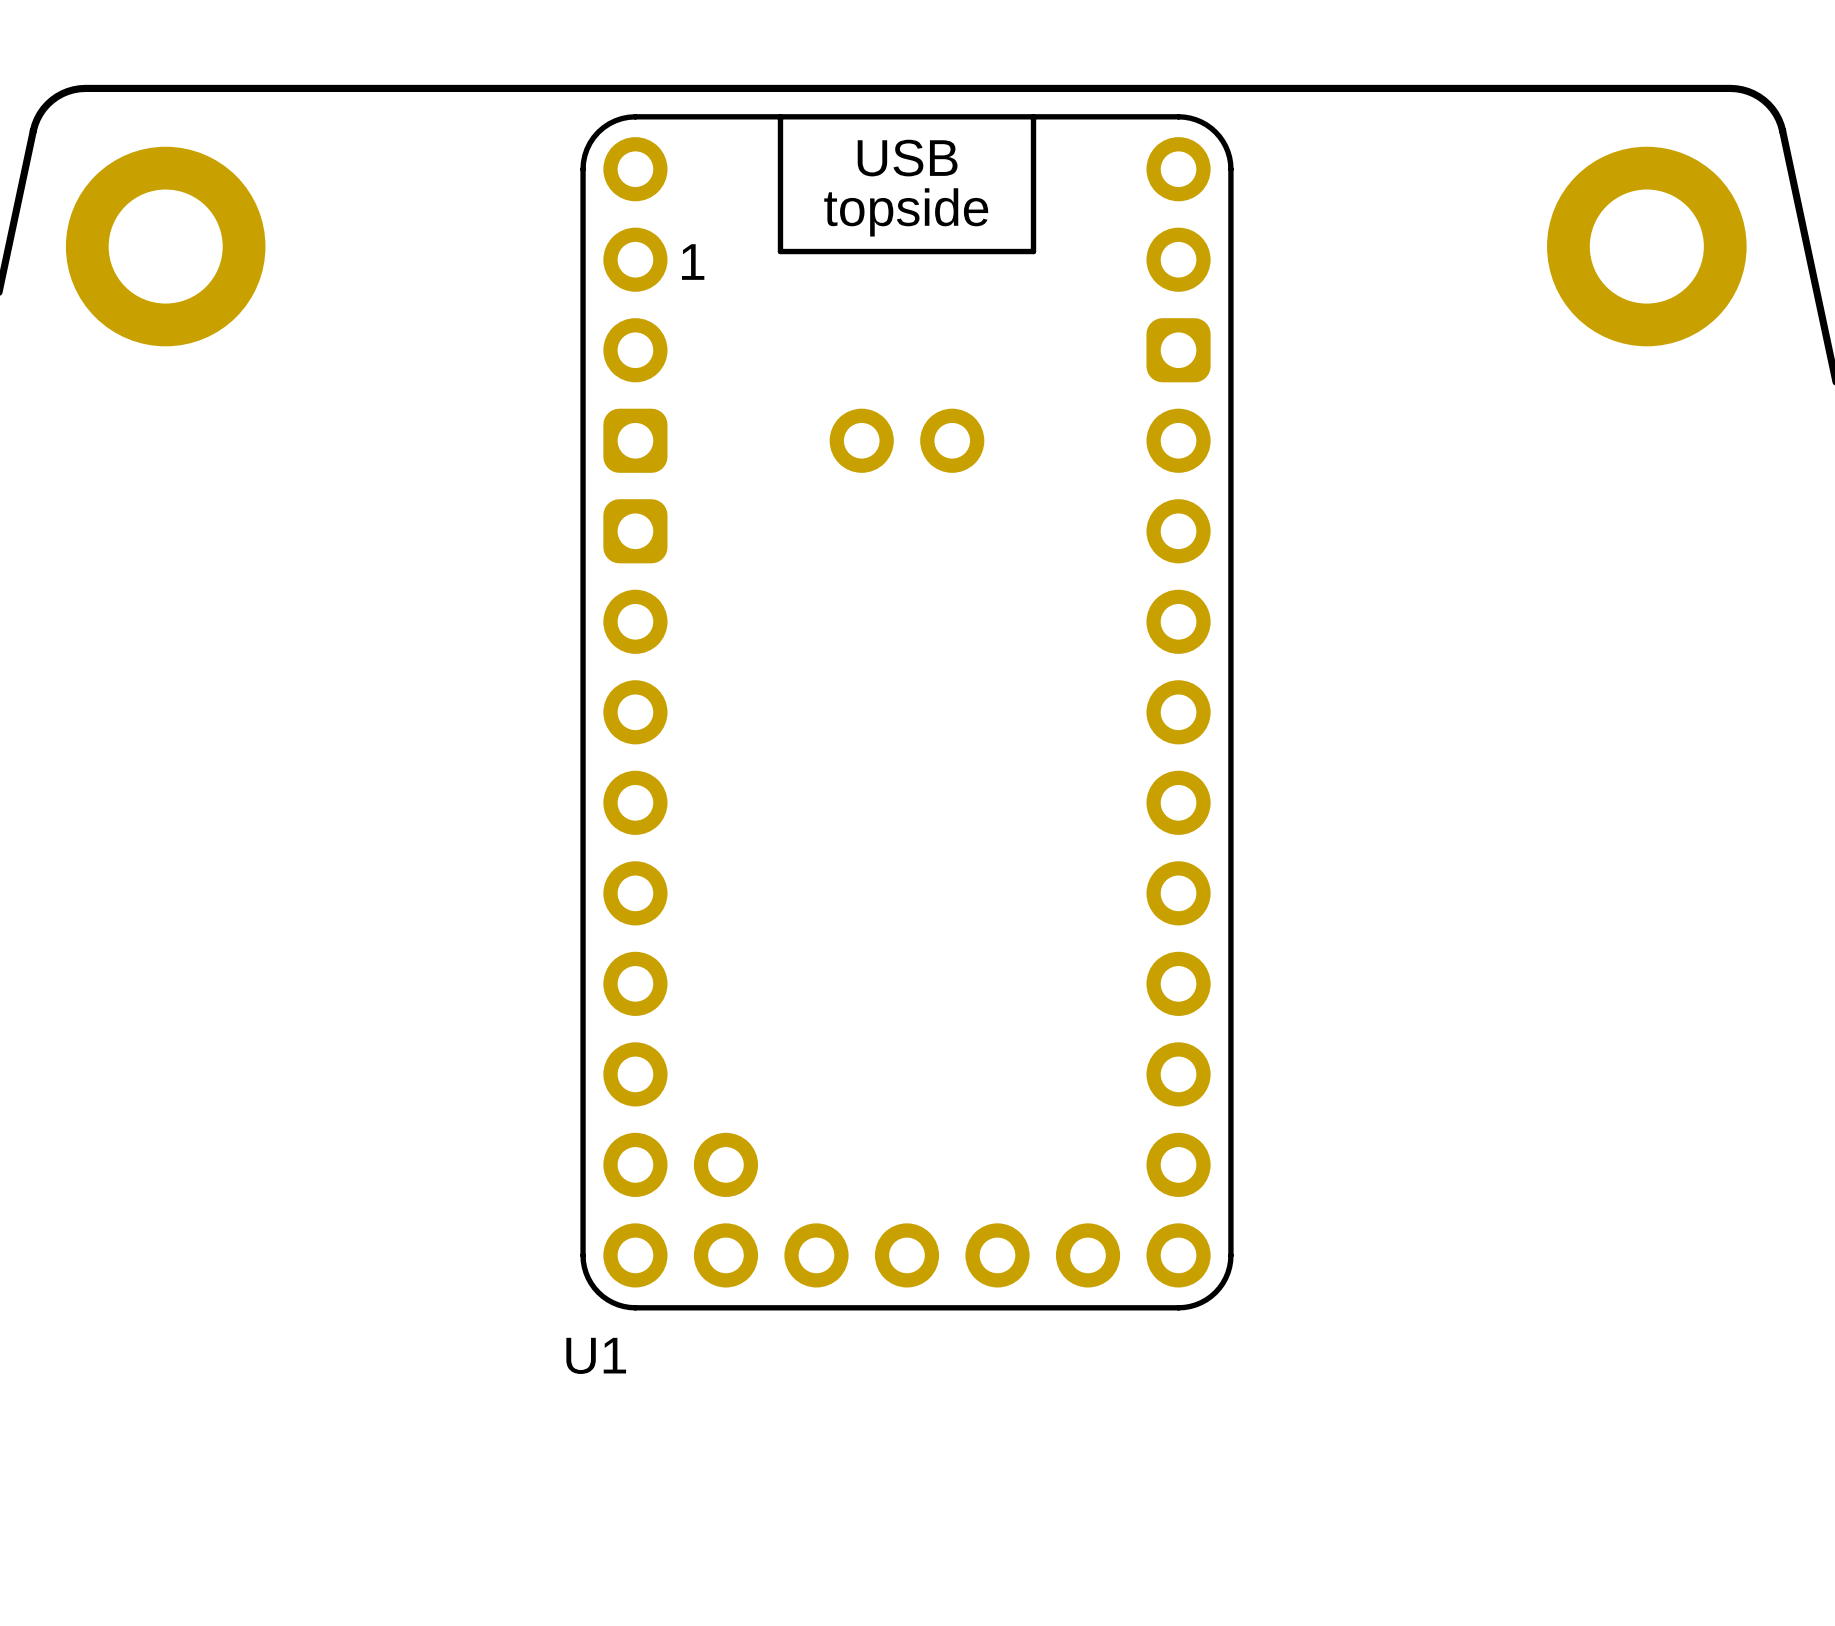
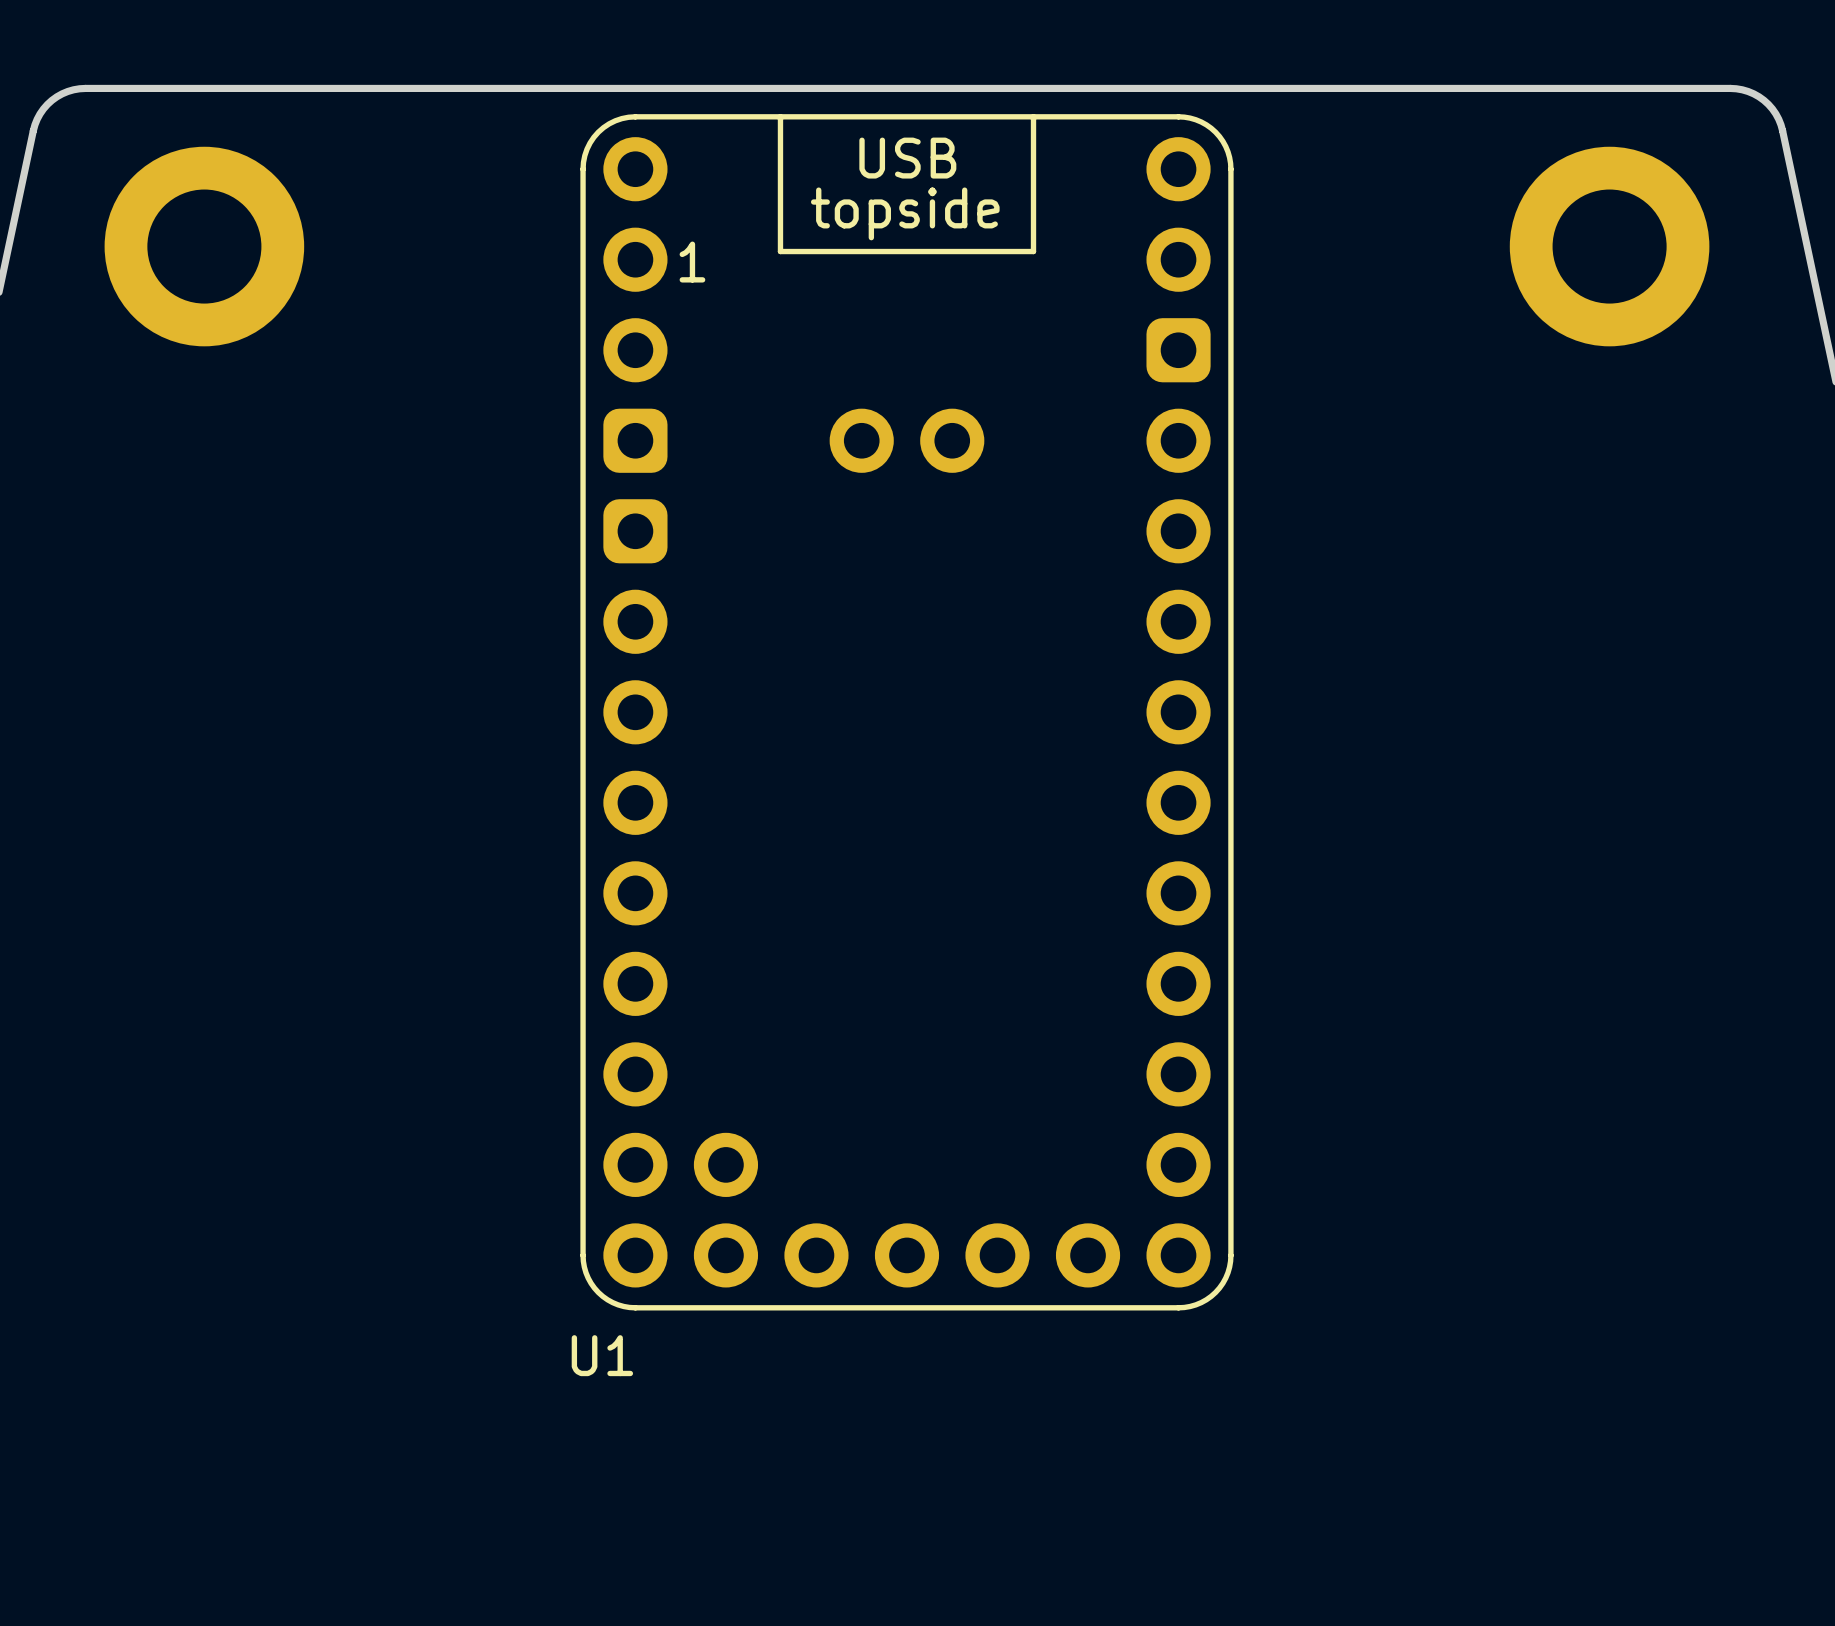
part position: (165, 246) -> (204, 246)
part position: (1646, 246) -> (1609, 246)

